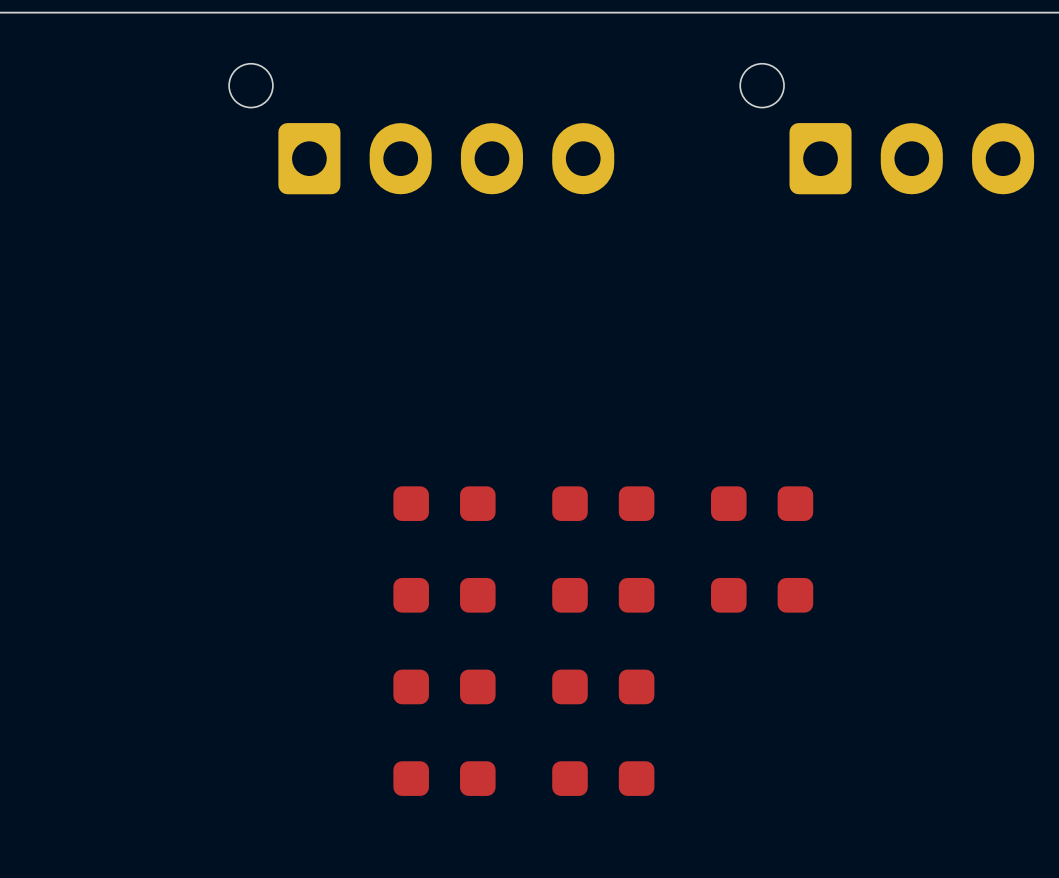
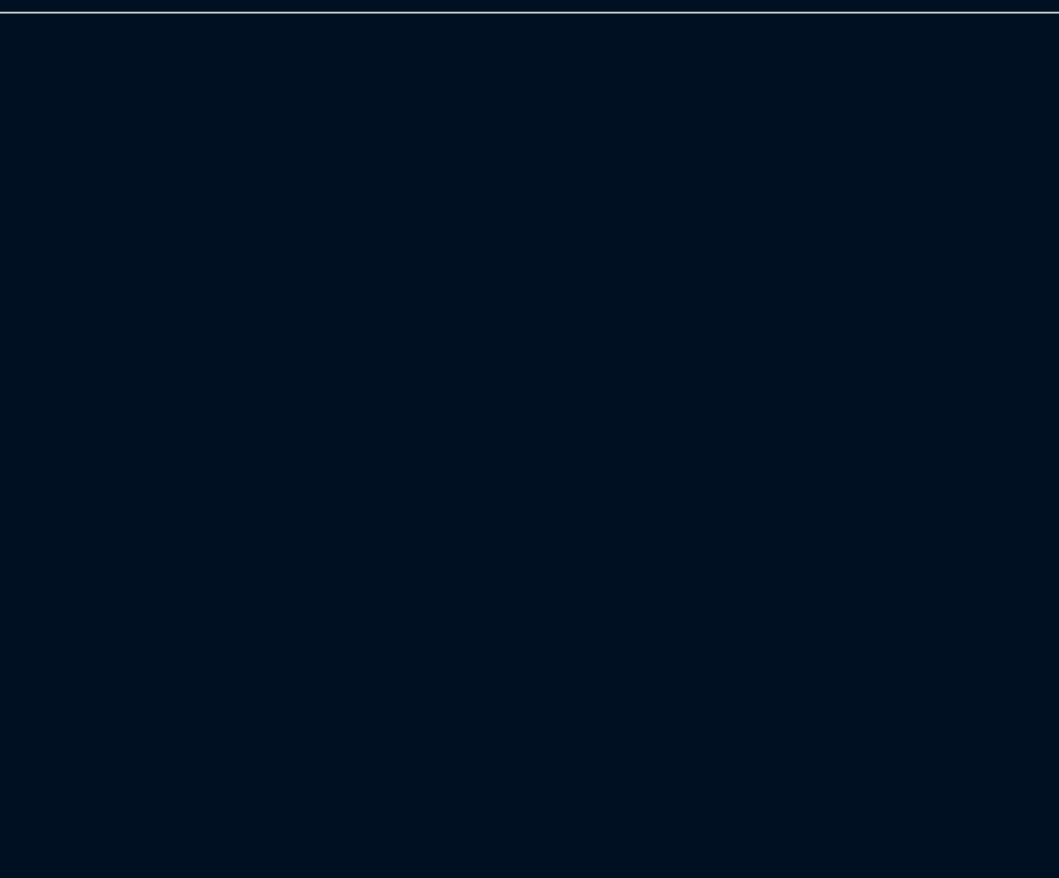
part: (421, 129) -> none
part: (887, 129) -> none
part: (444, 503) -> none
part: (603, 503) -> none
part: (762, 503) -> none
part: (444, 595) -> none
part: (603, 595) -> none
part: (762, 595) -> none
part: (444, 686) -> none
part: (603, 686) -> none
part: (444, 778) -> none
part: (603, 778) -> none

